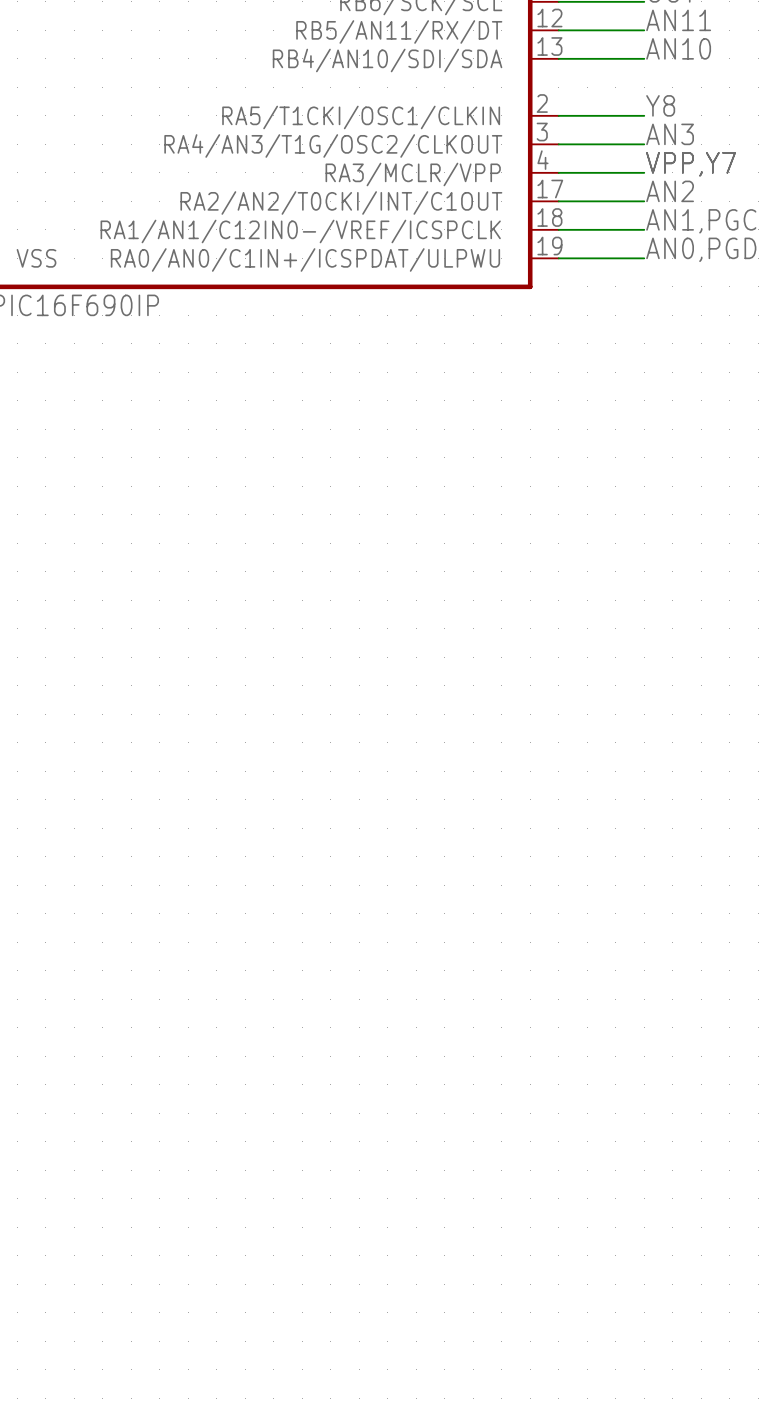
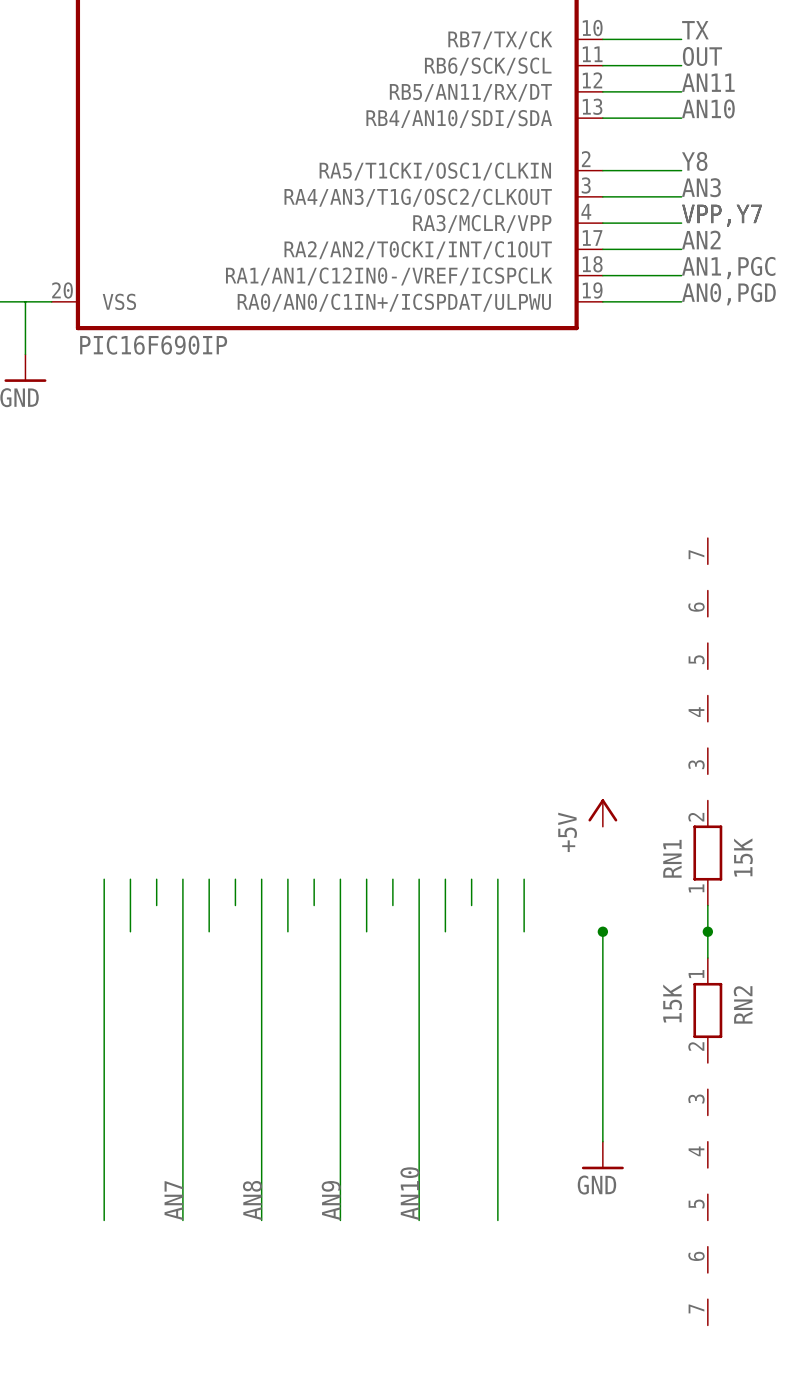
RN1: none -> 15K (707, 721)
power symbol: none -> +5V (602, 812)
wire: none -> (104, 879) (104, 1220)
wire: none -> (130, 879) (130, 931)
wire: none -> (156, 879) (156, 905)
wire: none -> (182, 879) (182, 1220)
wire: none -> (209, 879) (209, 931)
wire: none -> (235, 879) (235, 905)
wire: none -> (261, 879) (261, 1220)
wire: none -> (287, 879) (287, 931)
wire: none -> (314, 879) (314, 905)
wire: none -> (340, 879) (340, 1220)
wire: none -> (366, 879) (366, 931)
wire: none -> (392, 879) (392, 905)
wire: none -> (419, 879) (419, 1220)
wire: none -> (445, 879) (445, 931)
wire: none -> (471, 879) (471, 905)
wire: none -> (497, 879) (497, 1220)
wire: none -> (524, 879) (524, 931)
wire: none -> (707, 905) (707, 958)
wire: none -> (602, 931) (602, 1141)
junction: none -> (602, 931)
junction: none -> (707, 931)
RN2: none -> 15K (707, 1141)
power symbol: none -> GND (602, 1155)
label: none -> AN10 (409, 1193)
label: none -> AN7 (173, 1200)
label: none -> AN8 (252, 1200)
label: none -> AN9 (331, 1200)

